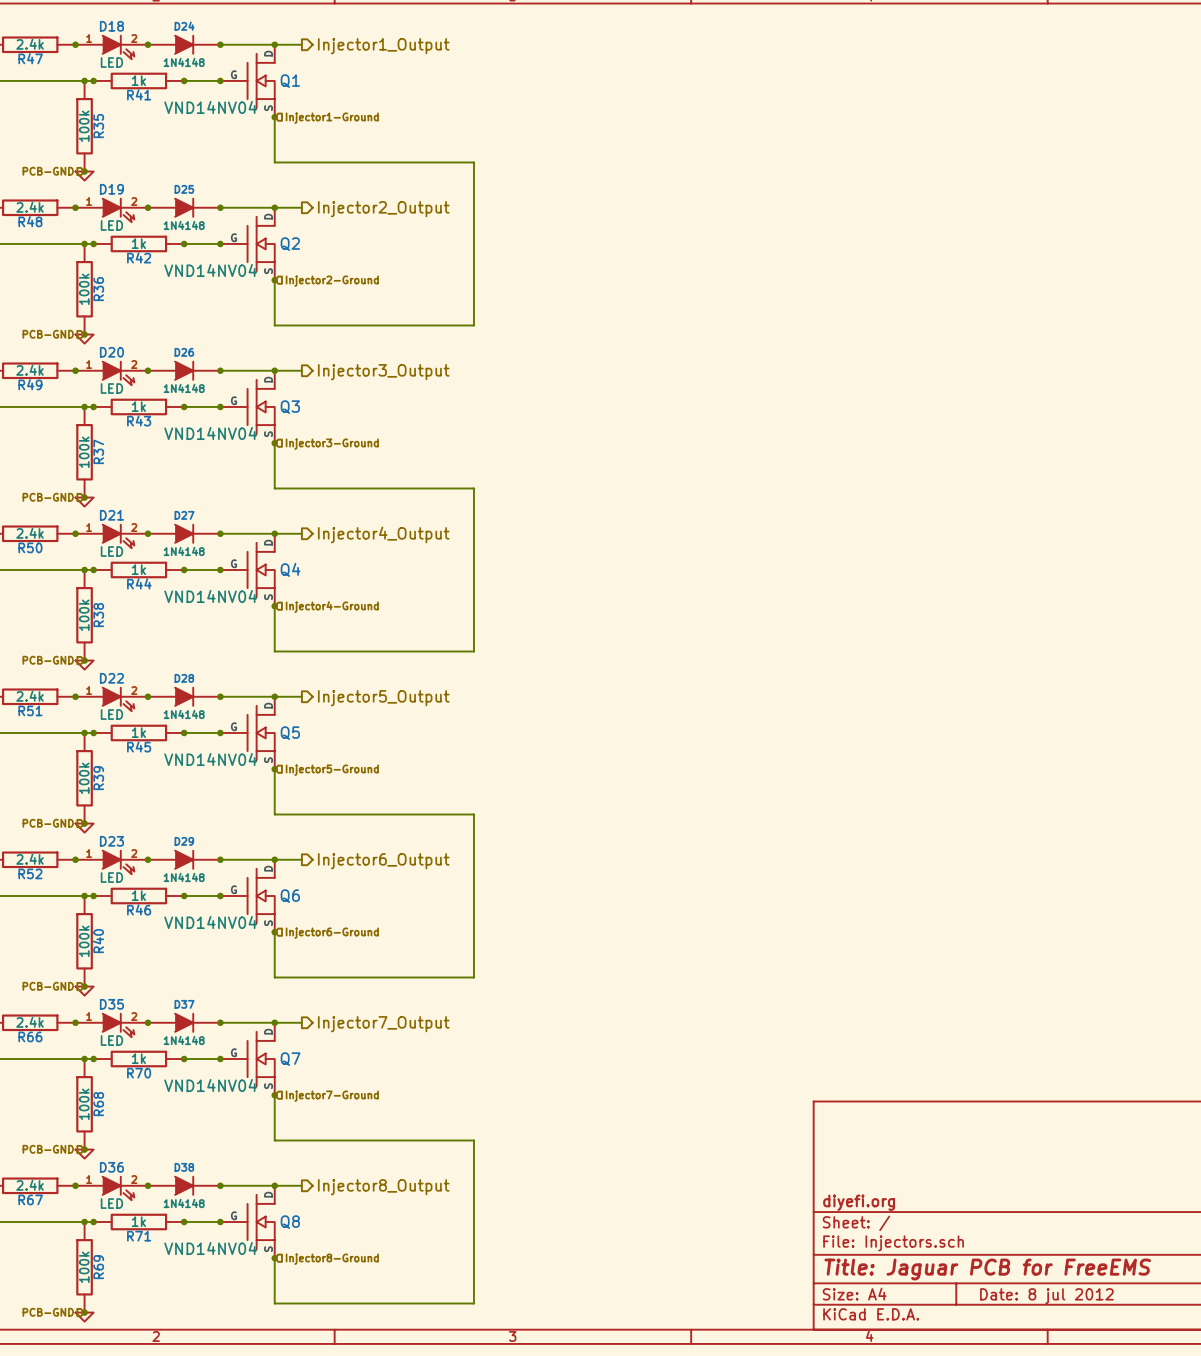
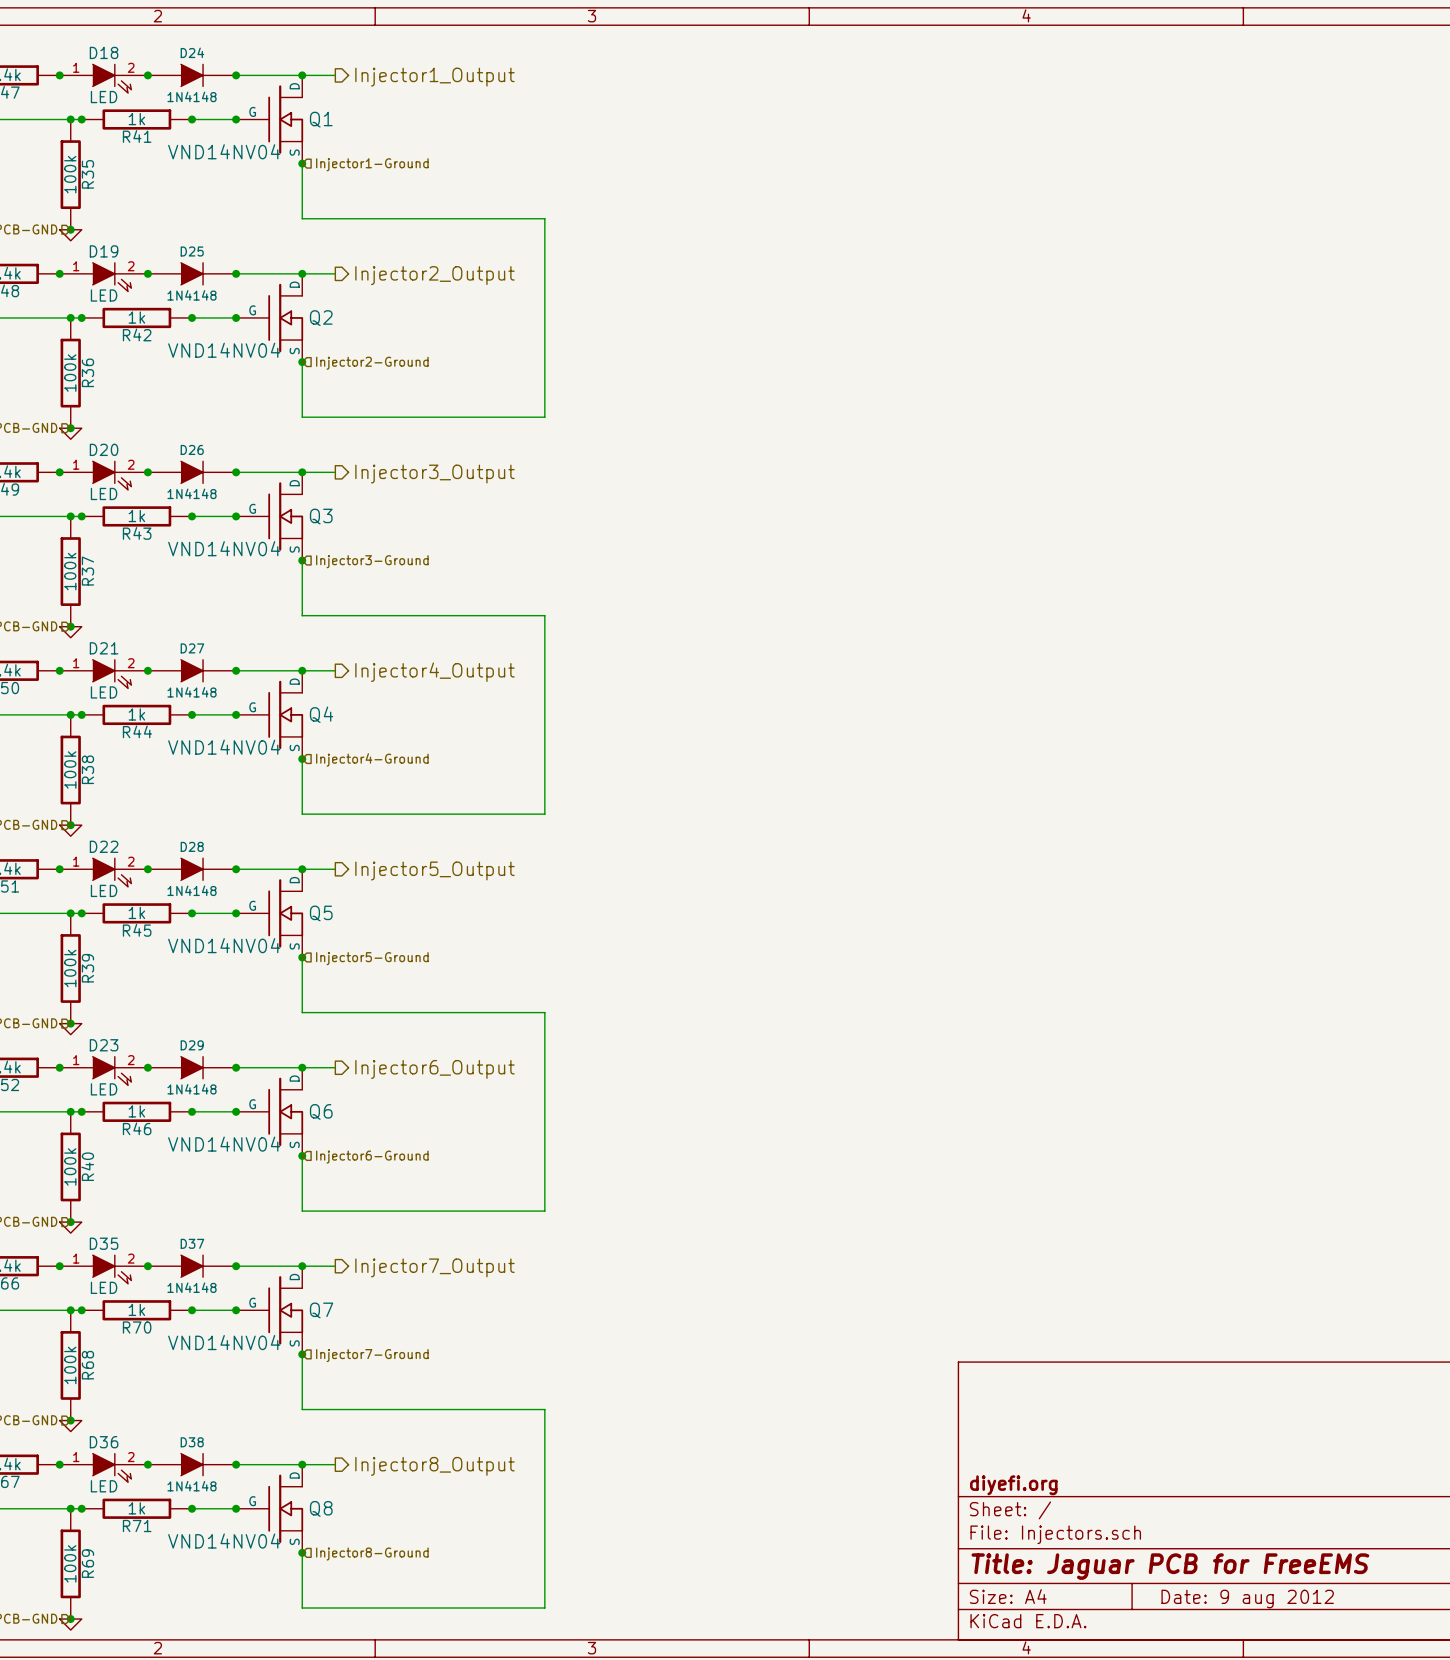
title block: Date: 8 jul 2012 (1046, 1296) -> Date: 9 aug 2012 (1247, 1599)

